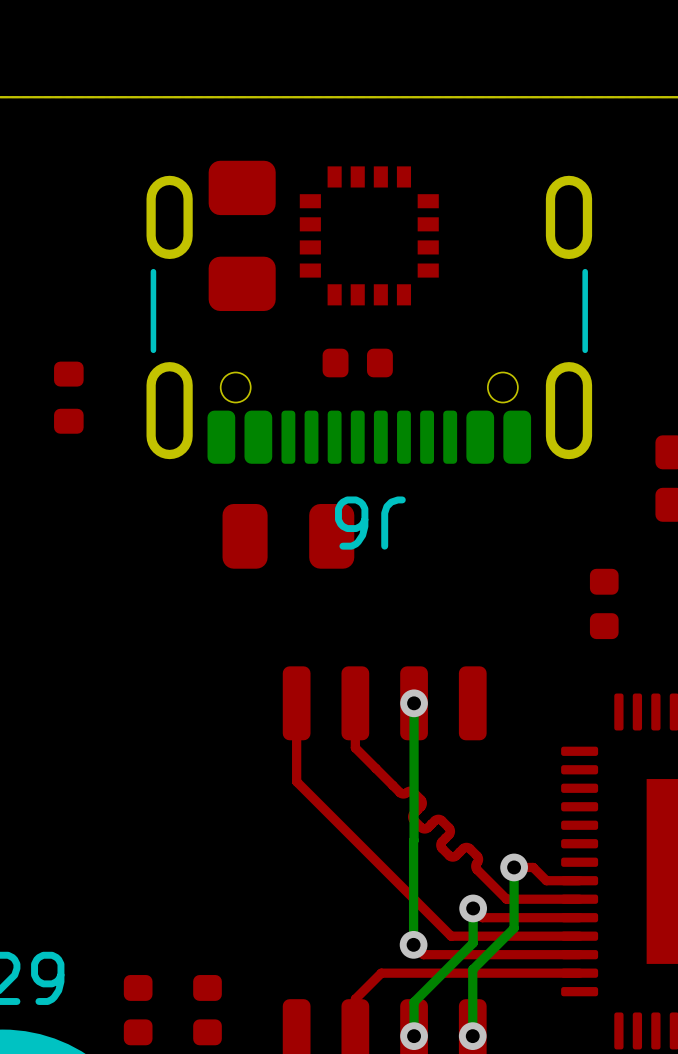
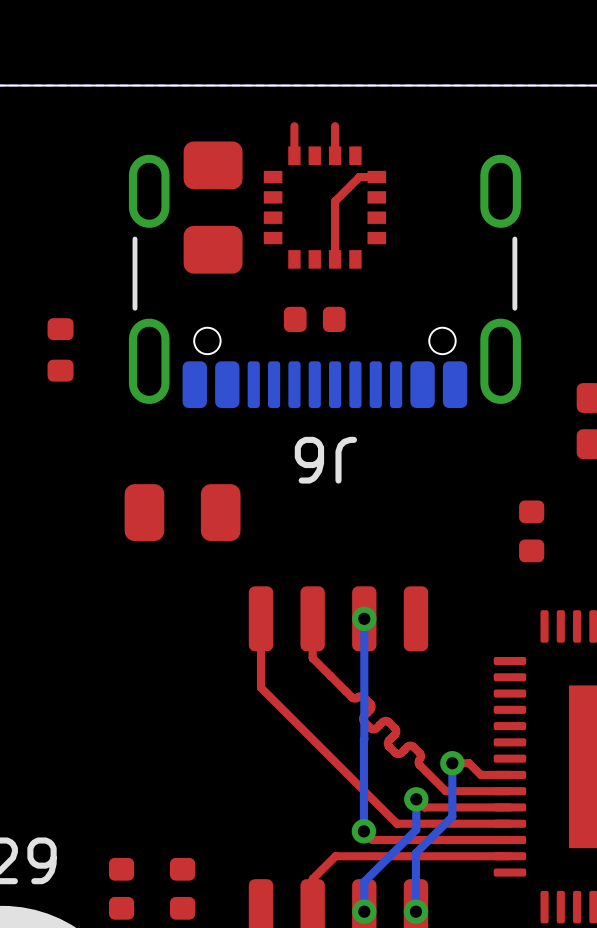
top track: none -> (294, 126) (294, 155)
top track: none -> (335, 126) (335, 155)
top track: none -> (376, 177) (359, 177) (335, 201) (335, 259)
part position: (288, 536) -> (182, 512)

